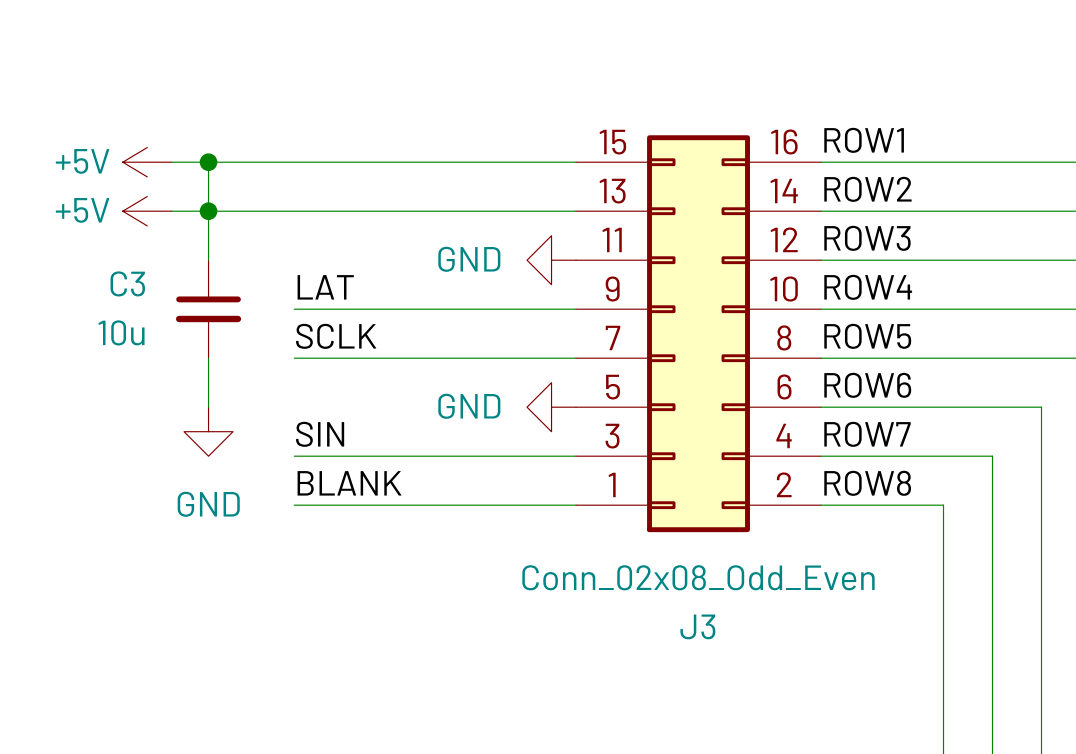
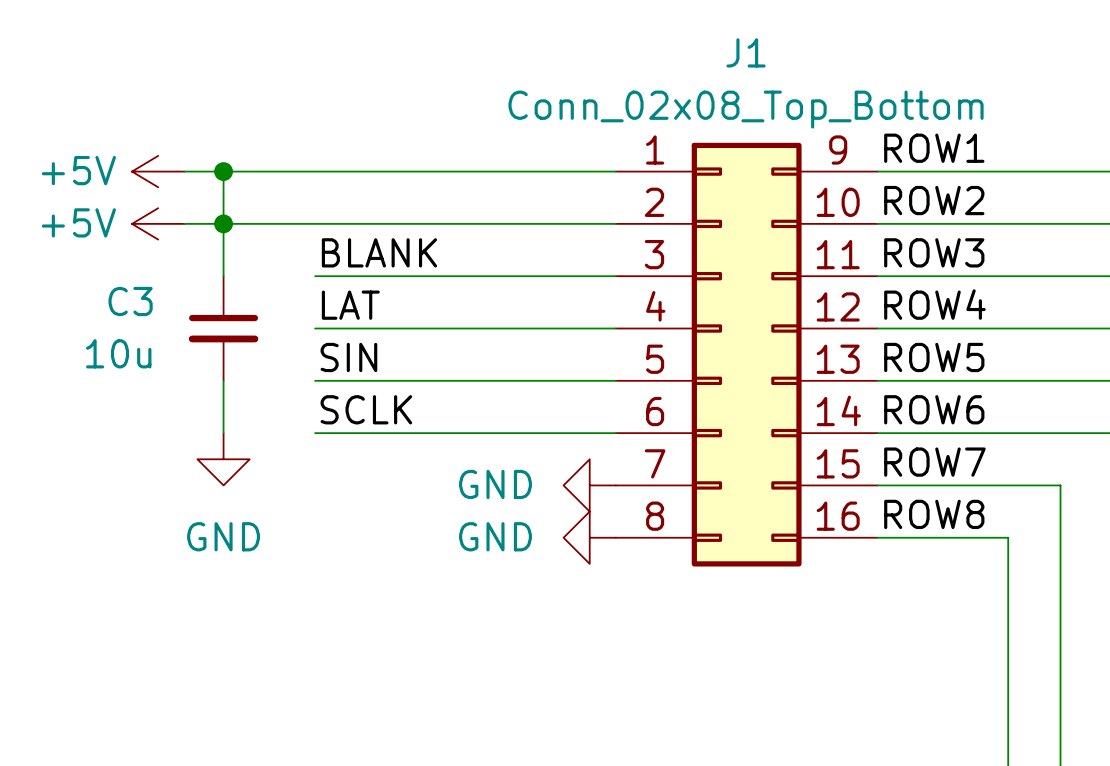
J3 symbol: [576, 135, 822, 533] -> [615, 142, 878, 567]
power symbol: GND (551, 260) -> none
label: SCLK (336, 336) -> SIN (348, 357)
label: none -> SCLK (366, 409)
power symbol: GND (551, 407) -> none
label: SIN (320, 434) -> none
wire: (294, 456) (576, 456) -> (315, 433) (615, 433)
power symbol: none -> GND (589, 485)
label position: BLANK (349, 483) -> BLANK (379, 252)
wire: (294, 505) (576, 505) -> (315, 276) (615, 276)
power symbol: none -> GND (589, 537)
J3 value: Conn_02x08_Odd_Even (698, 577) -> Conn_02x08_Top_Bottom (746, 109)
J3 name: J3 (697, 626) -> J1 (746, 52)

